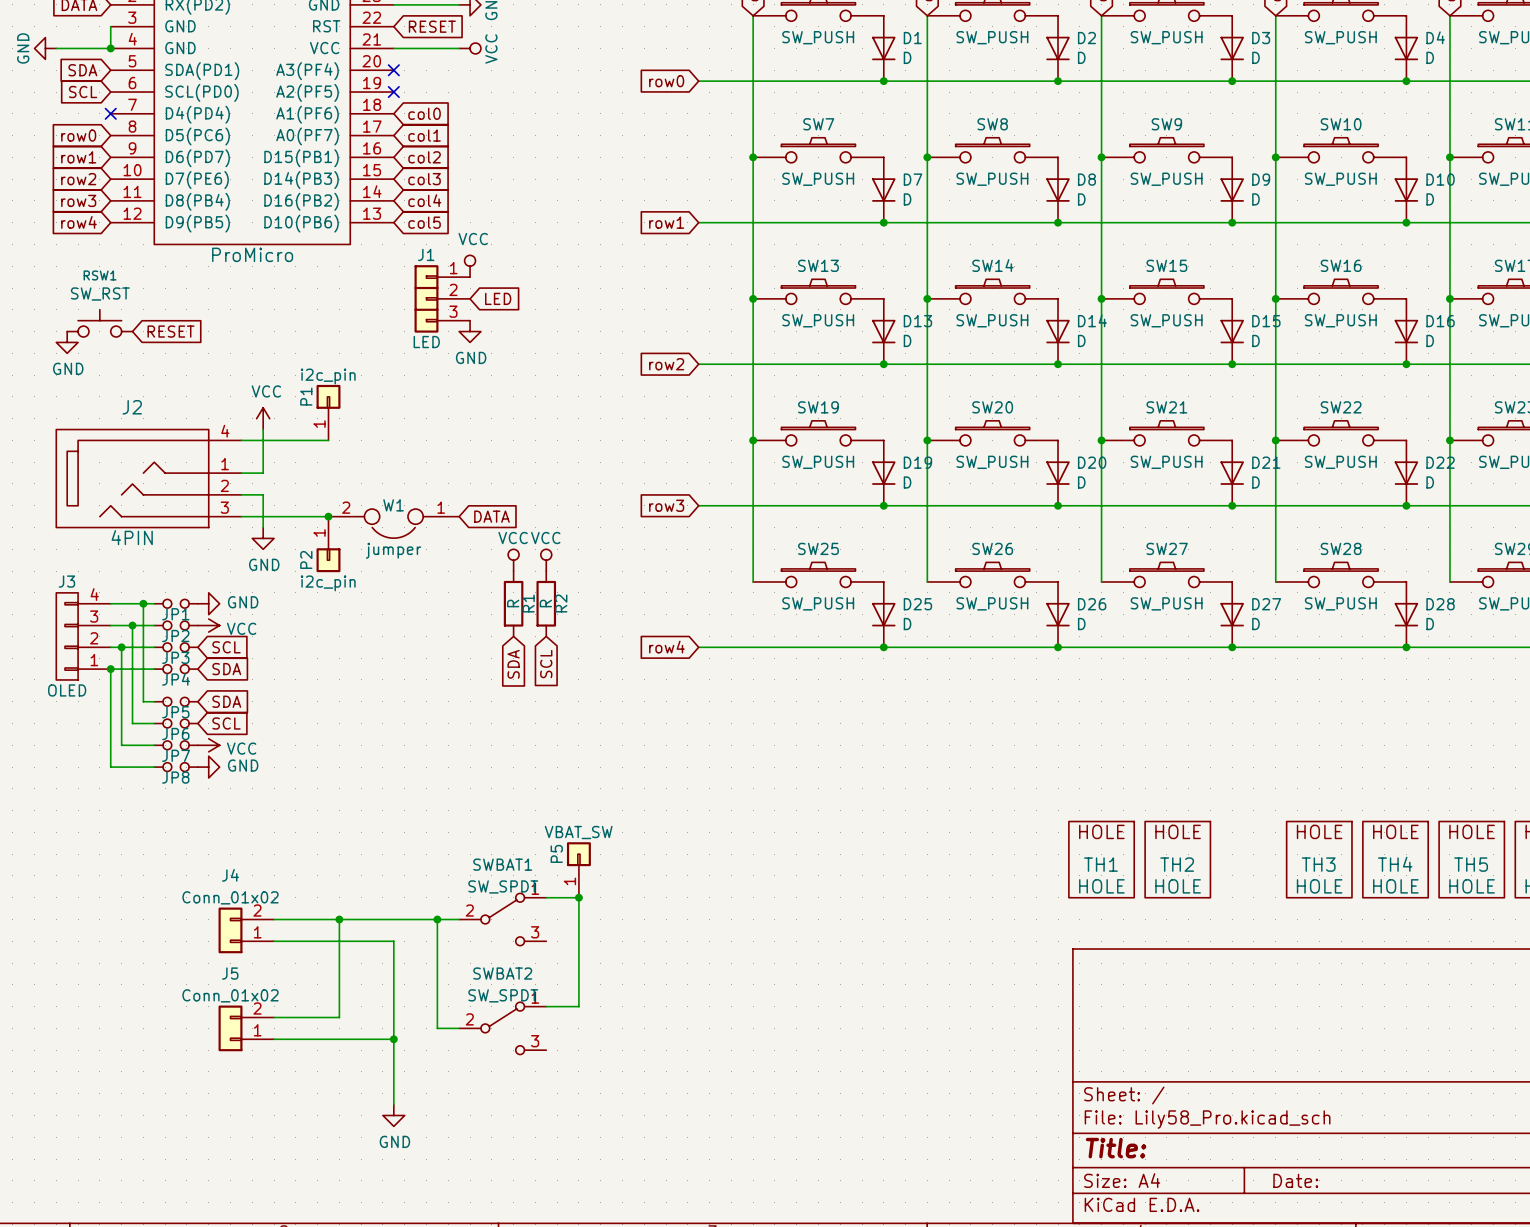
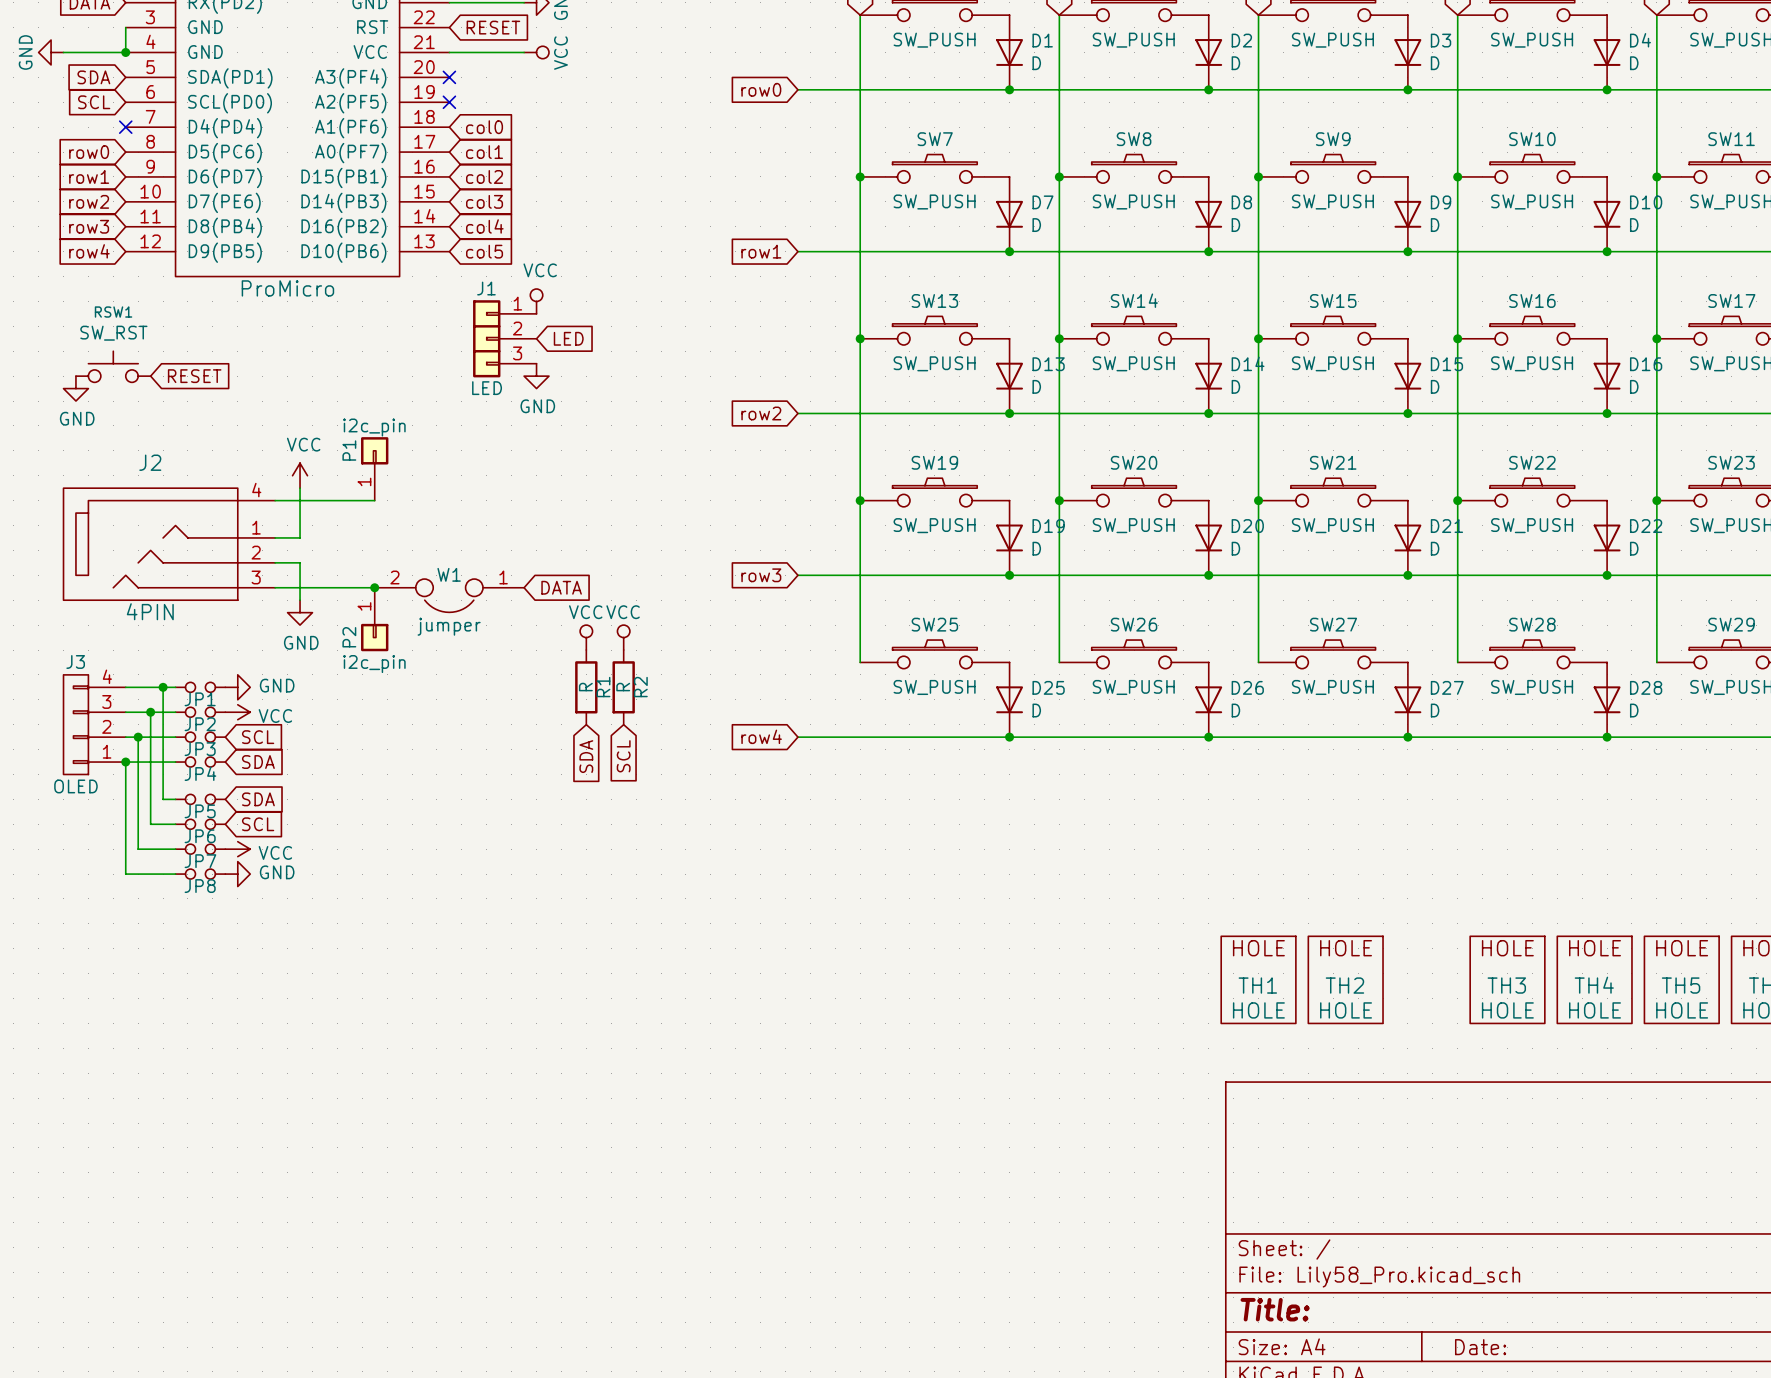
P5: VBAT_SW (578, 869) -> none
wire: (546, 897) (578, 897) (578, 1006) (546, 1006) -> none
junction: (578, 897) -> none
wire: (274, 919) (459, 919) -> none
wire: (339, 919) (339, 1017) (274, 1017) -> none
junction: (339, 919) -> none
wire: (437, 919) (437, 1028) (459, 1028) -> none
junction: (437, 919) -> none
SWBAT1: SW_SPDT (502, 919) -> none
J4: Conn_01x02 (246, 930) -> none
wire: (274, 941) (393, 941) (393, 1104) -> none
J5: Conn_01x02 (246, 1028) -> none
SWBAT2: SW_SPDT (502, 1028) -> none
wire: (274, 1039) (393, 1039) -> none
junction: (393, 1039) -> none
power symbol: GND (393, 1115) -> none

